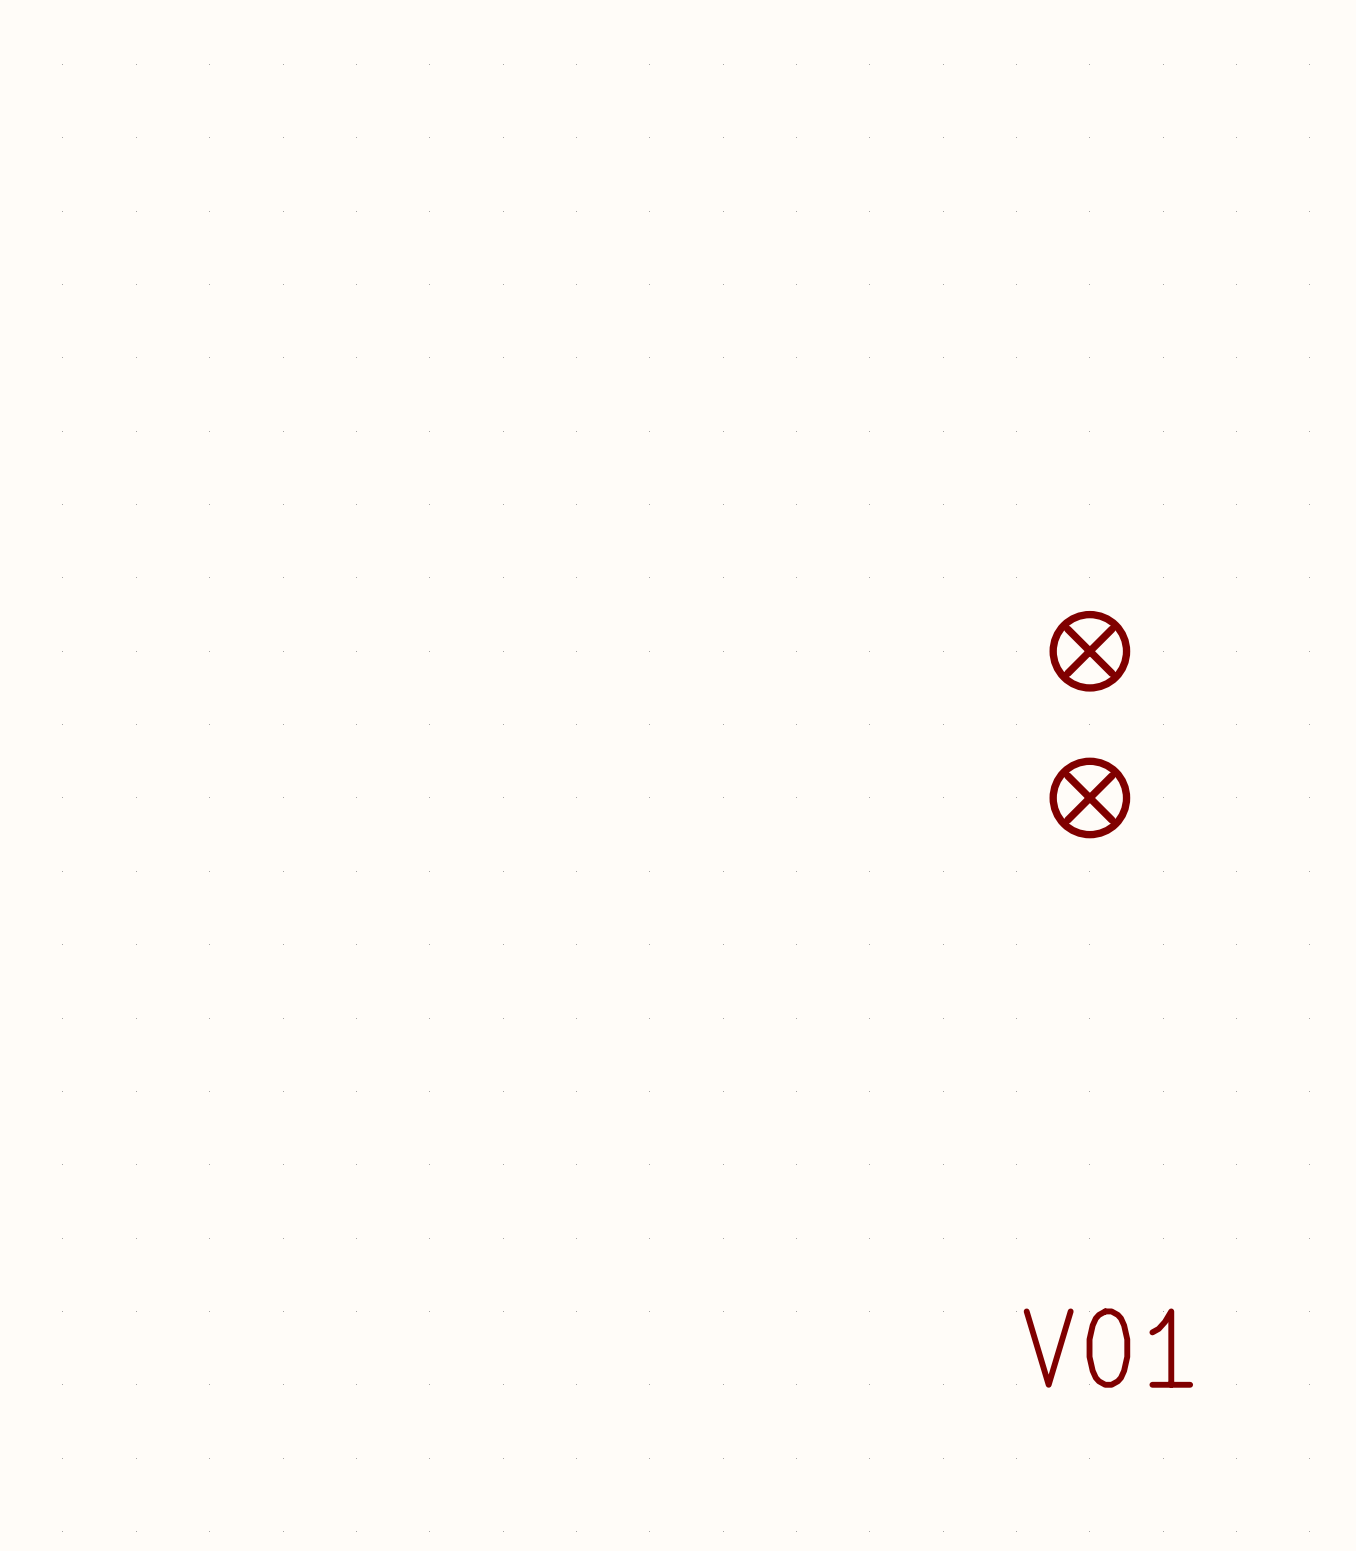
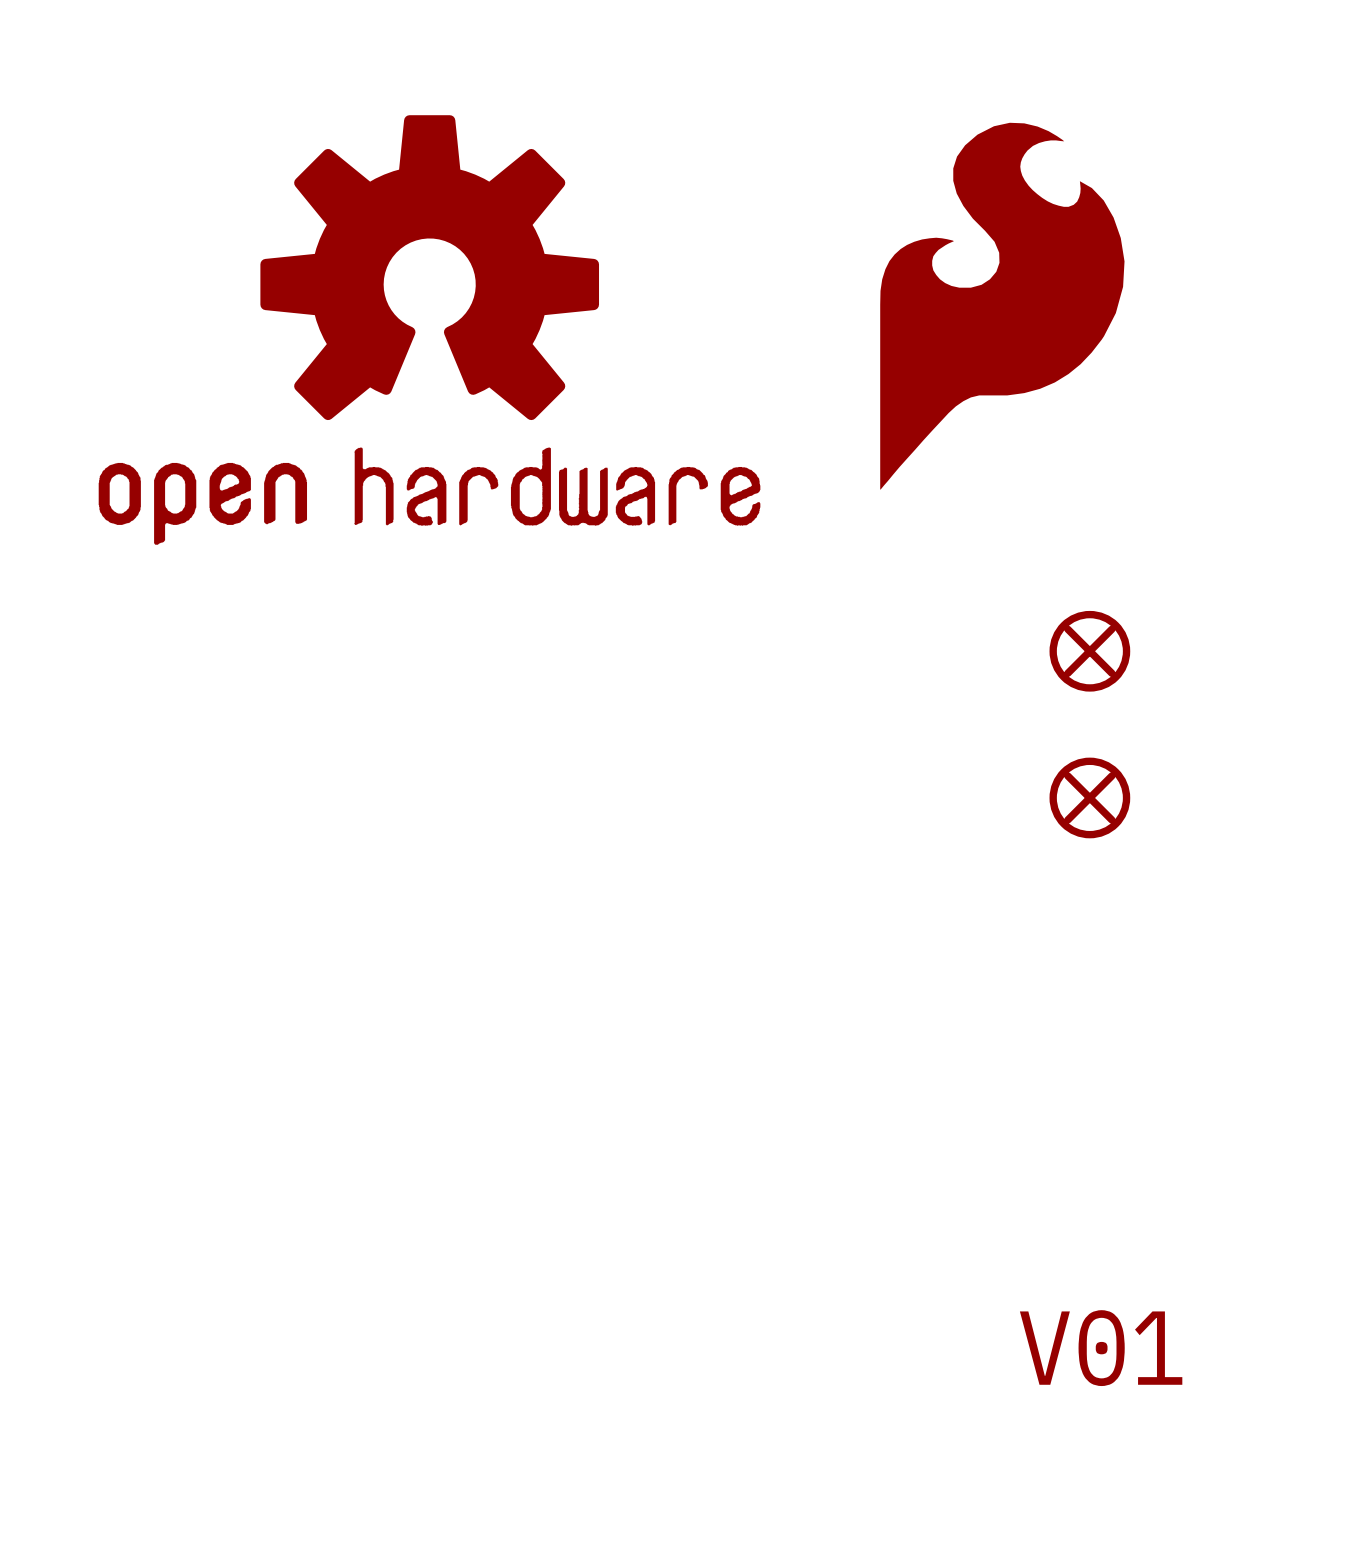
part: none -> (1002, 306)
part: none -> (429, 329)

